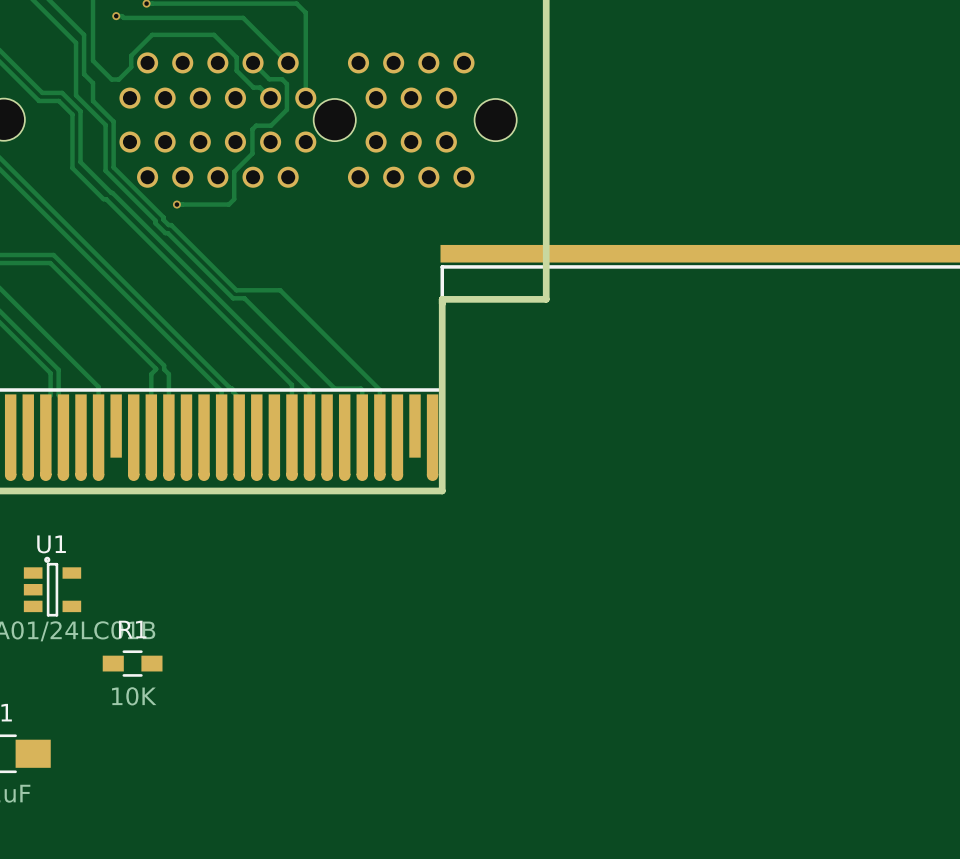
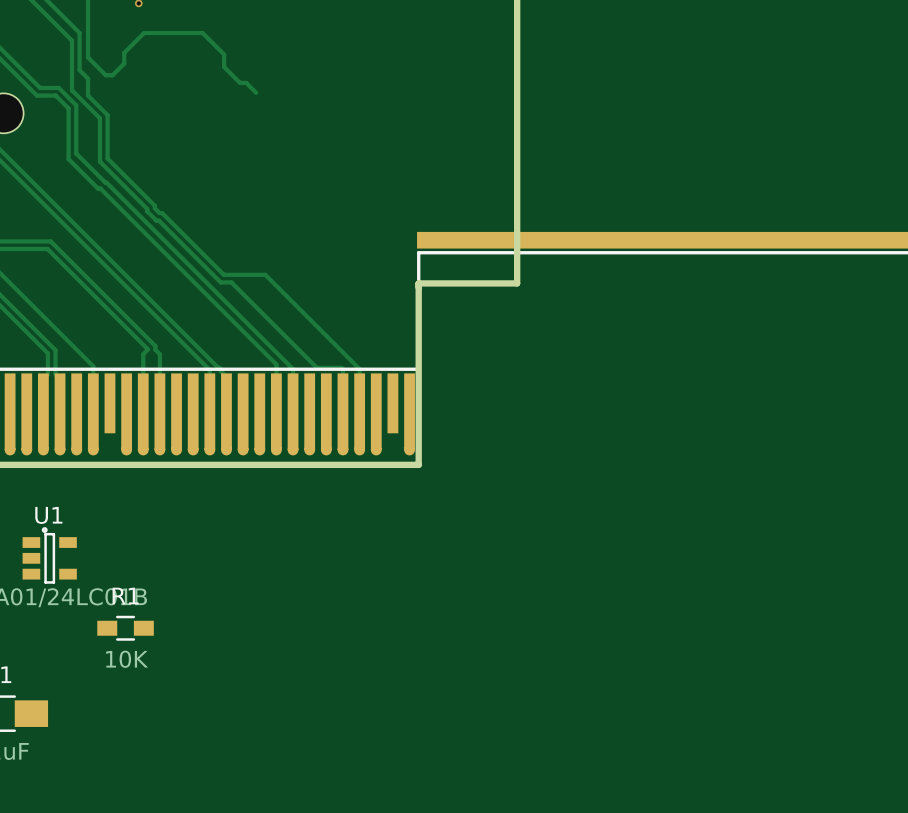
track: (146, 3) (296, 3) (305, 12) (305, 98) -> none
track: (116, 16) (123, 17) (243, 17) (288, 62) -> none
via: (116, 16) -> none
track: (253, 62) (269, 79) (282, 79) (286, 84) (286, 109) (270, 125) (256, 125) (252, 129) (252, 153) (234, 171) (234, 199) (228, 204) (176, 204) -> none
part: (318, 120) -> none
via: (176, 204) -> none

